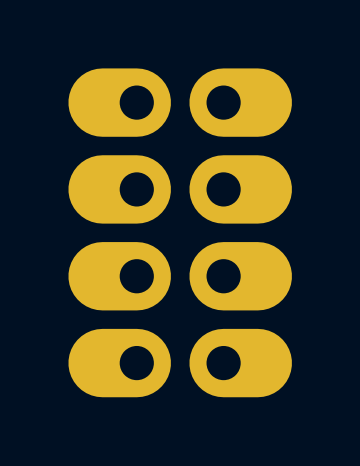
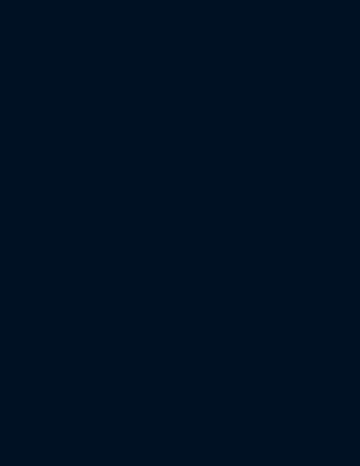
part: (180, 232) -> none

